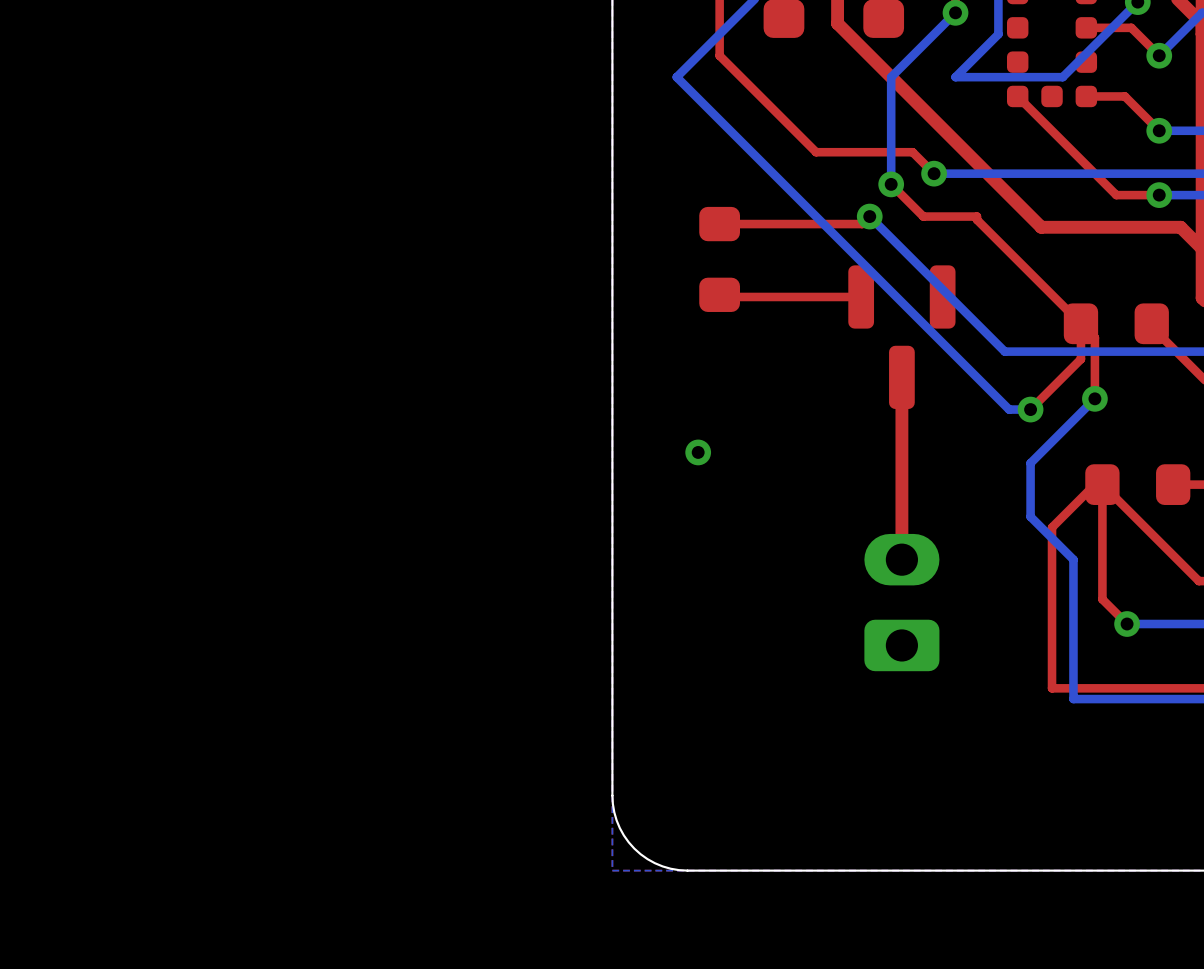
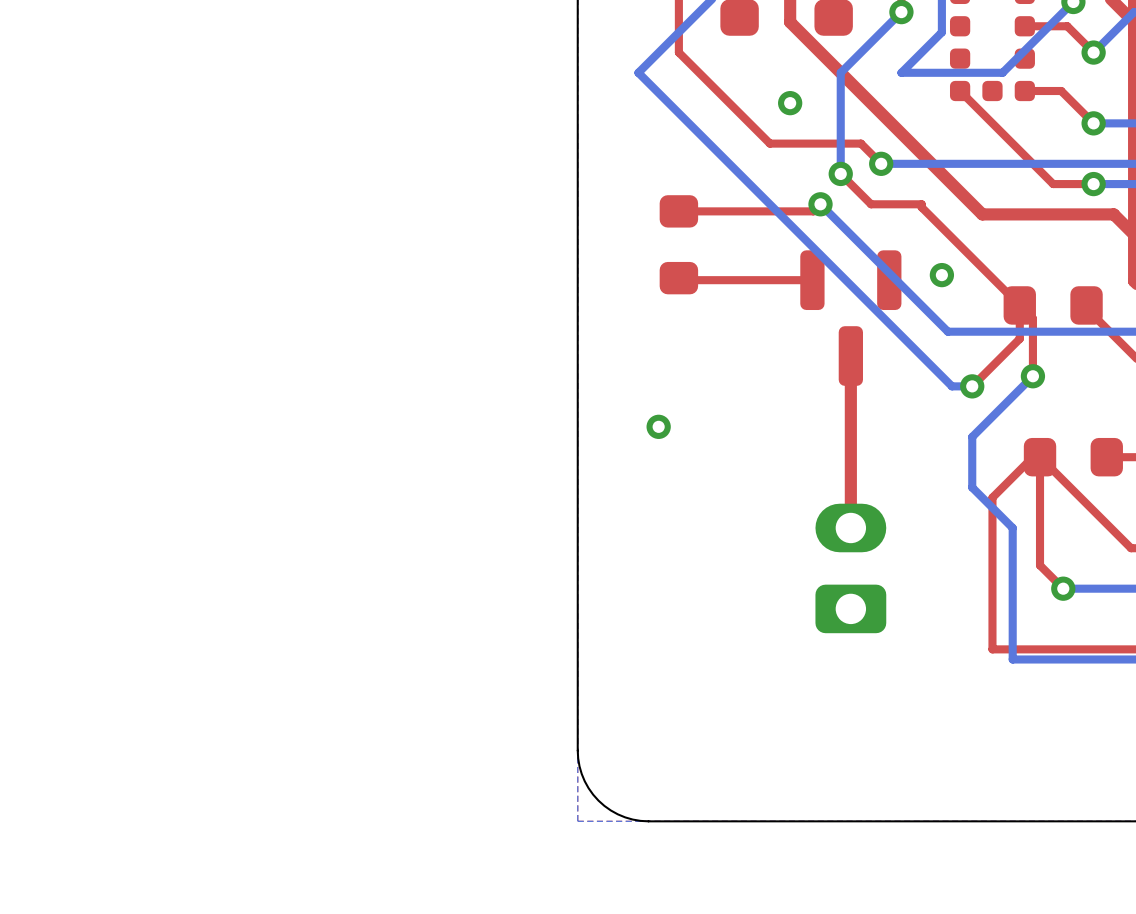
via: none -> (790, 103)
via: none -> (941, 275)

